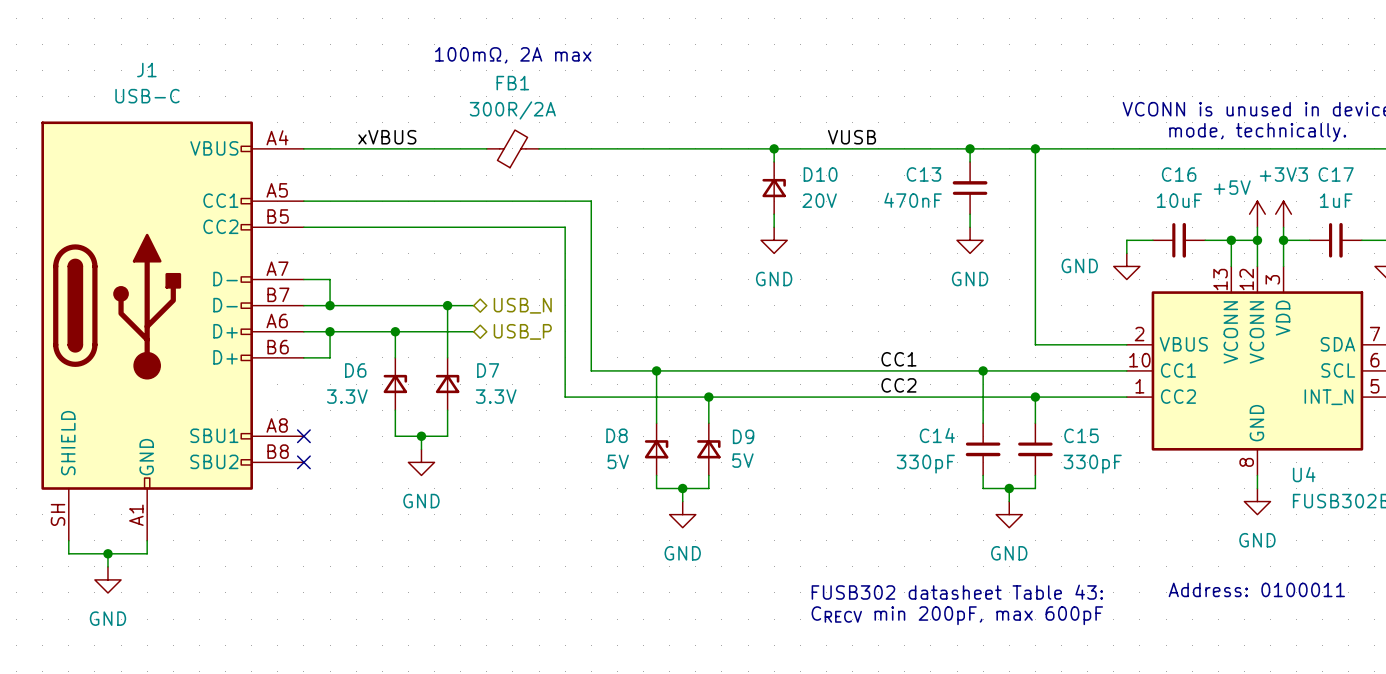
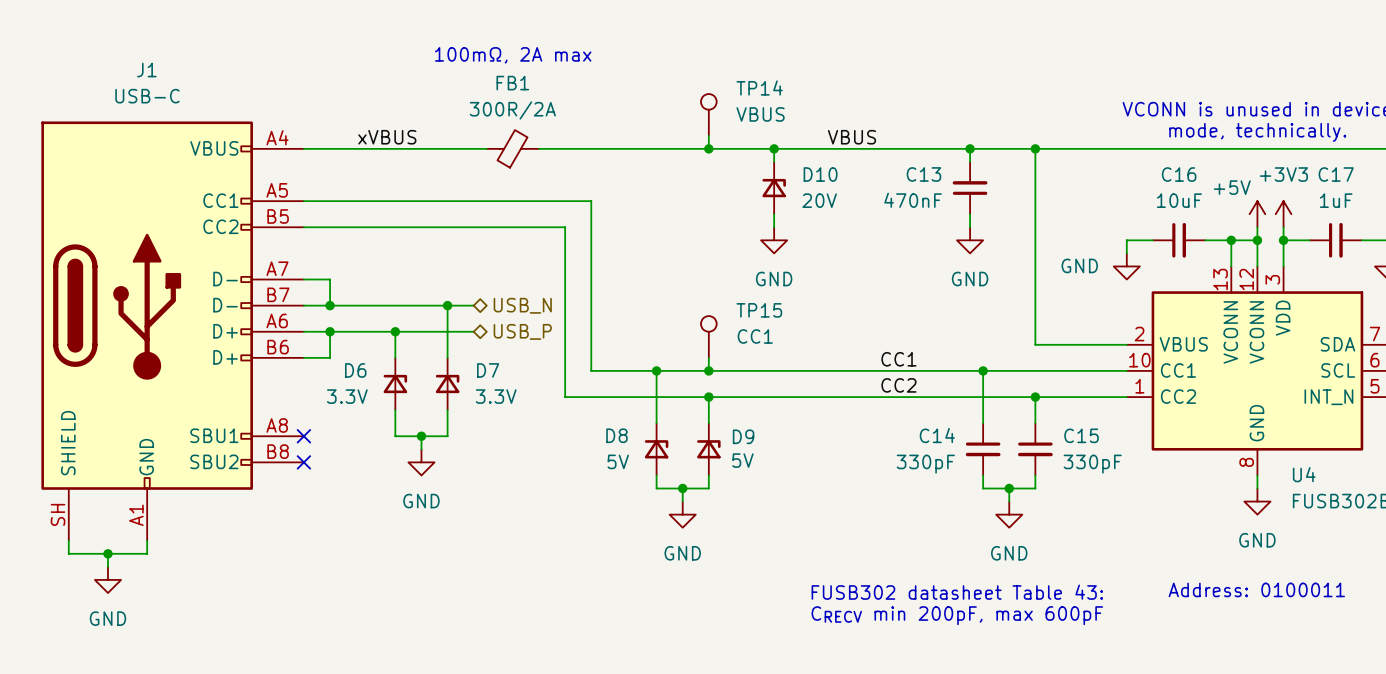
TP14: none -> VBUS (708, 114)
wire: none -> (708, 135) (708, 148)
label: VUSB (851, 137) -> VBUS (851, 137)
junction: none -> (708, 148)
TP15: none -> CC1 (708, 336)
wire: none -> (708, 357) (708, 370)
junction: none -> (708, 370)

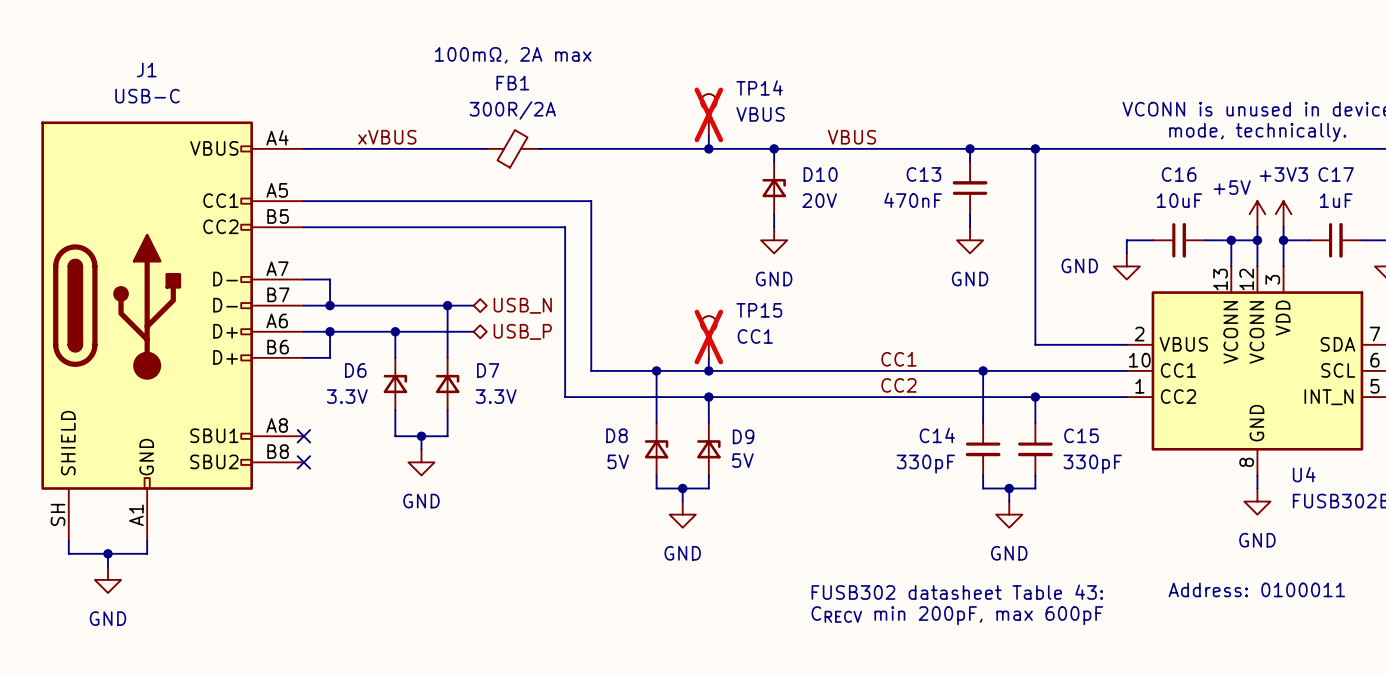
TP14 do-not-place cross: none -> (708, 114)
TP15 do-not-place cross: none -> (708, 336)

